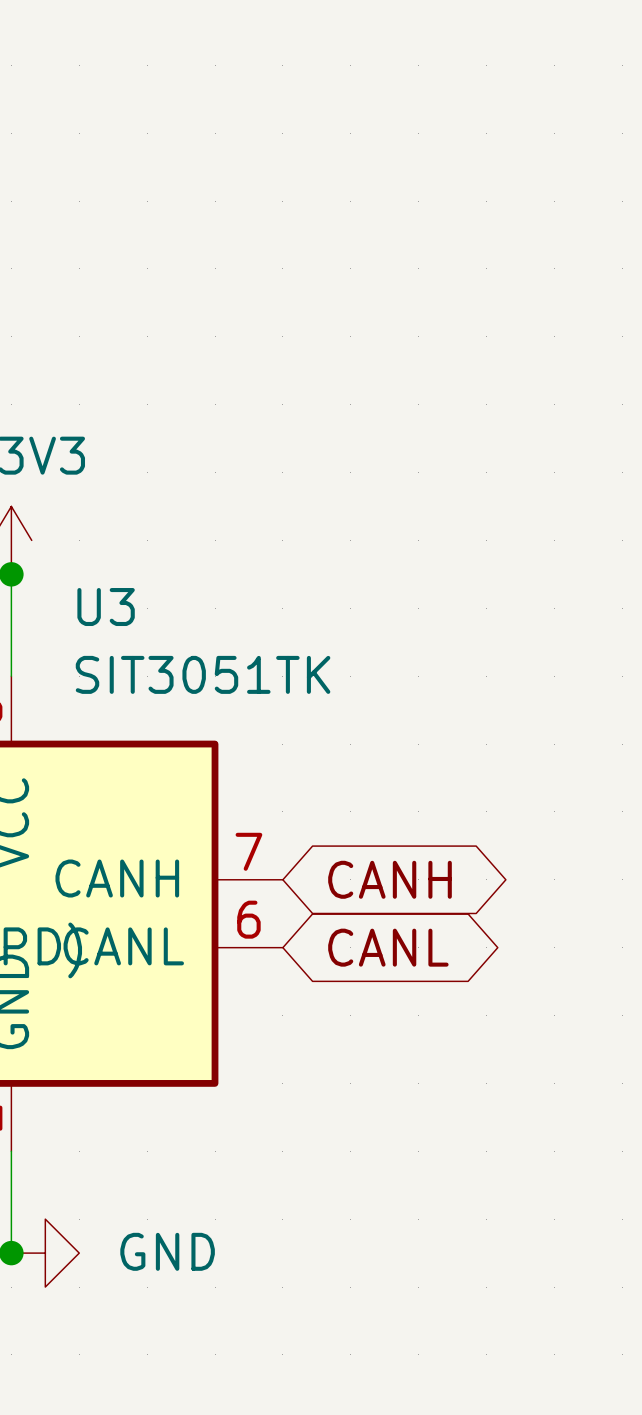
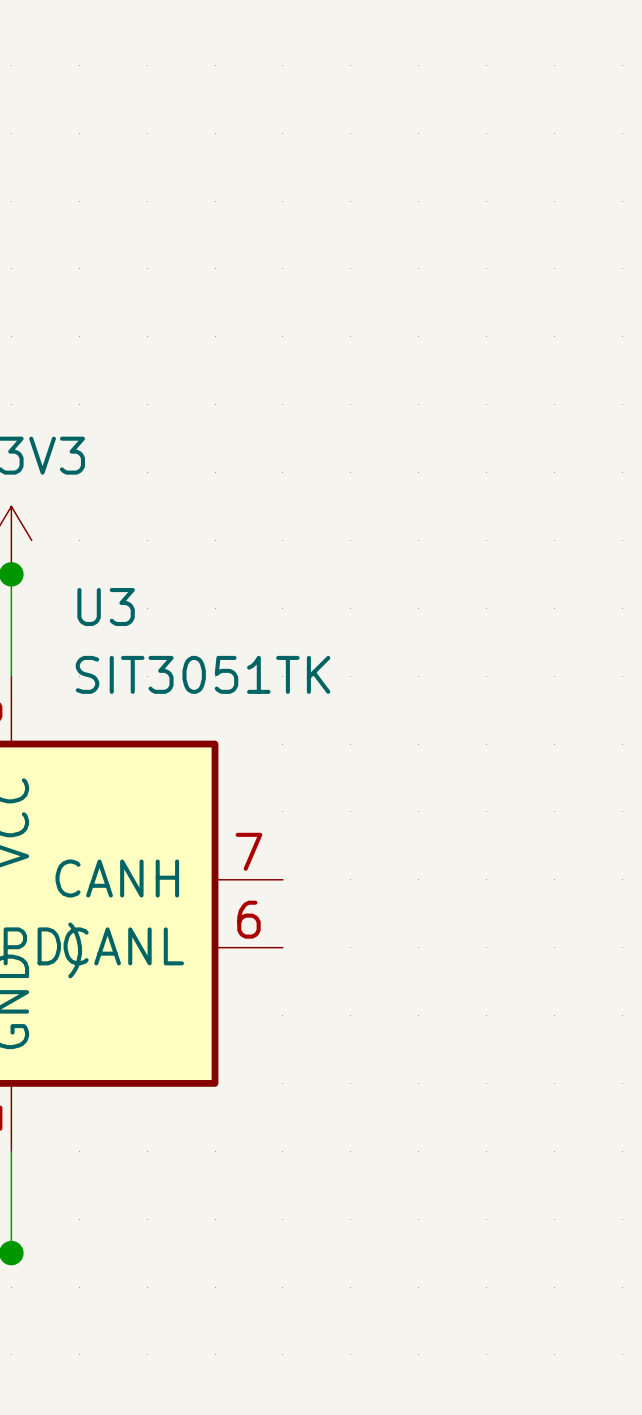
global label: CANH (390, 879) -> none
global label: CANL (388, 947) -> none
power symbol: GND (45, 1253) -> none

